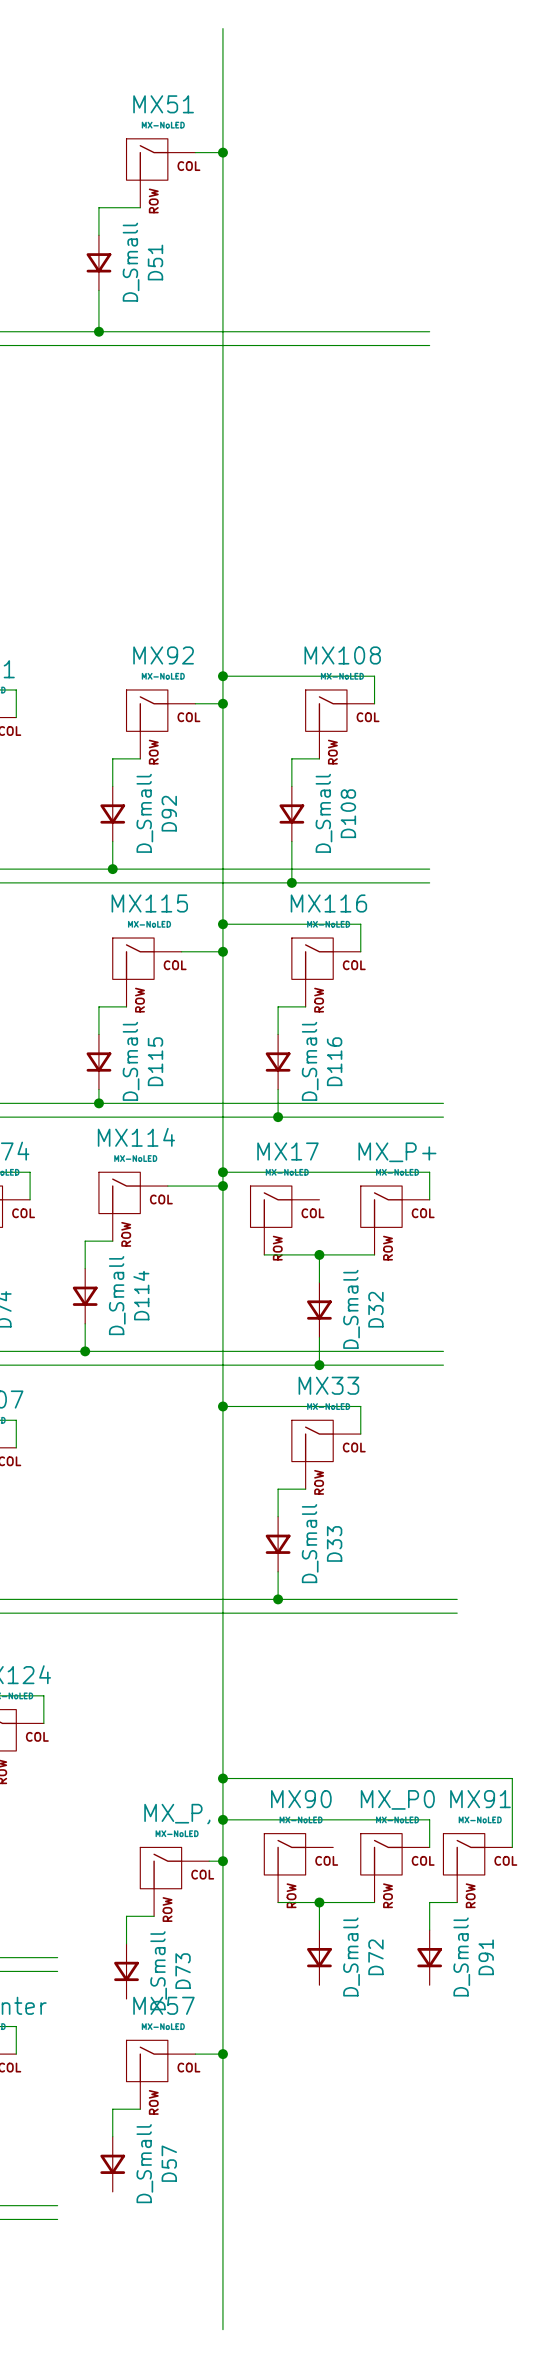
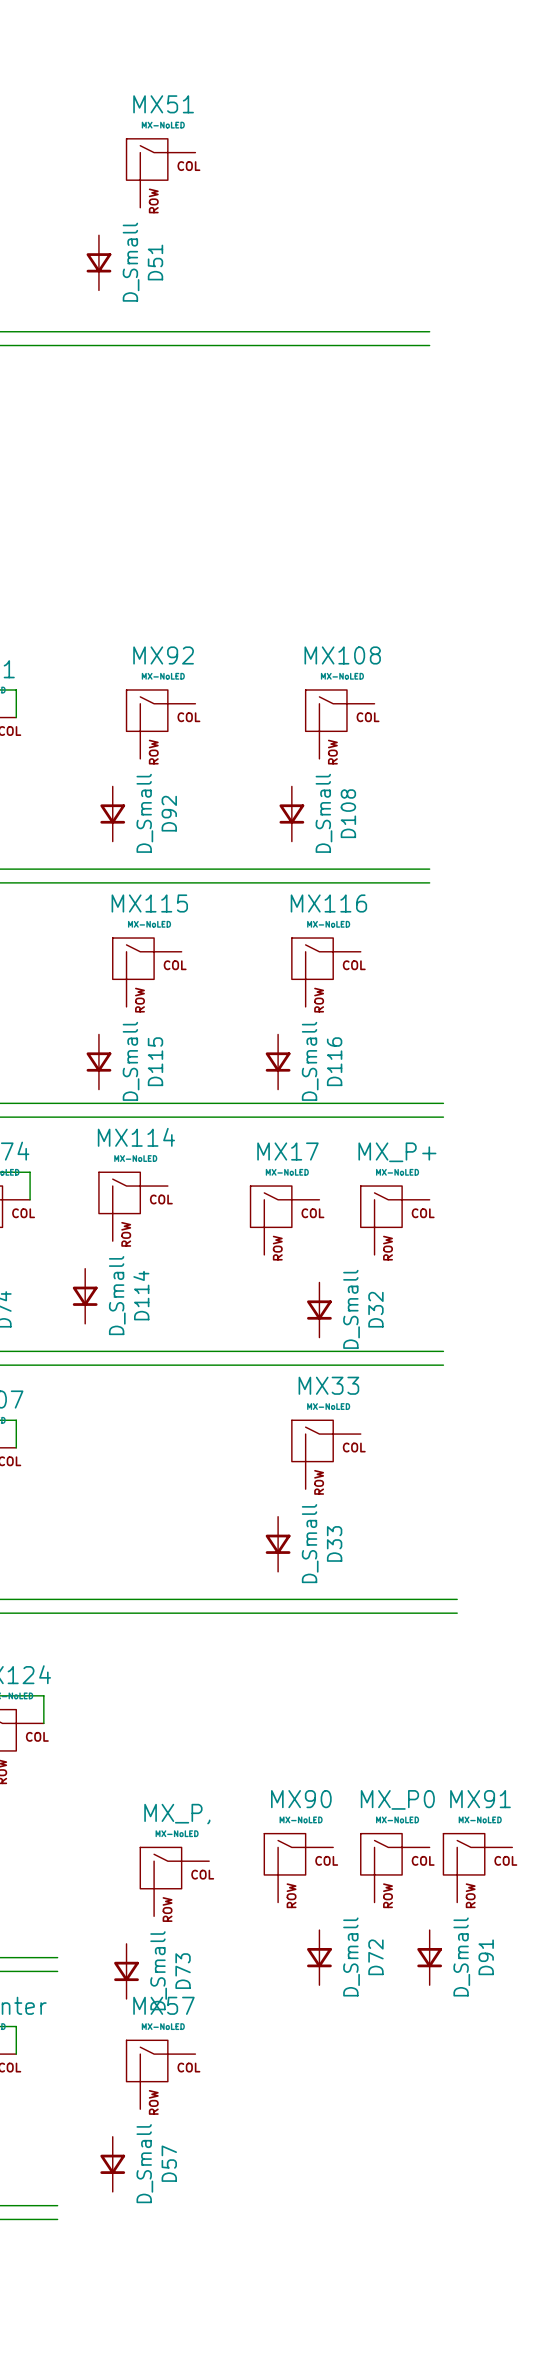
wire: (222, 28) (222, 2329) -> none
wire: (195, 152) (222, 152) -> none
junction: (222, 152) -> none
wire: (140, 207) (98, 207) (98, 235) -> none
wire: (98, 290) (98, 331) -> none
junction: (98, 331) -> none
wire: (222, 676) (374, 676) (374, 703) -> none
junction: (222, 676) -> none
wire: (195, 703) (222, 703) -> none
junction: (222, 703) -> none
wire: (140, 758) (112, 758) (112, 786) -> none
wire: (319, 758) (291, 758) (291, 786) -> none
wire: (112, 841) (112, 869) -> none
wire: (291, 841) (291, 882) -> none
junction: (112, 869) -> none
junction: (291, 882) -> none
wire: (222, 924) (360, 924) (360, 951) -> none
junction: (222, 924) -> none
wire: (181, 951) (222, 951) -> none
junction: (222, 951) -> none
wire: (126, 1006) (98, 1006) (98, 1034) -> none
wire: (305, 1006) (278, 1006) (278, 1034) -> none
wire: (98, 1089) (98, 1103) -> none
wire: (278, 1089) (278, 1117) -> none
junction: (98, 1103) -> none
junction: (278, 1117) -> none
wire: (222, 1172) (429, 1172) (429, 1199) -> none
junction: (222, 1172) -> none
wire: (167, 1186) (222, 1186) -> none
junction: (222, 1186) -> none
wire: (112, 1241) (85, 1241) (85, 1268) -> none
wire: (264, 1254) (374, 1254) -> none
wire: (319, 1254) (319, 1282) -> none
junction: (319, 1254) -> none
wire: (85, 1323) (85, 1351) -> none
wire: (319, 1337) (319, 1365) -> none
junction: (85, 1351) -> none
junction: (319, 1365) -> none
wire: (222, 1406) (360, 1406) (360, 1434) -> none
junction: (222, 1406) -> none
wire: (305, 1489) (278, 1489) (278, 1516) -> none
wire: (278, 1571) (278, 1599) -> none
junction: (278, 1599) -> none
wire: (222, 1778) (512, 1778) (512, 1847) -> none
junction: (222, 1778) -> none
wire: (222, 1819) (429, 1819) (429, 1847) -> none
junction: (222, 1819) -> none
wire: (209, 1861) (222, 1861) -> none
junction: (222, 1861) -> none
wire: (278, 1902) (374, 1902) -> none
wire: (319, 1902) (319, 1930) -> none
junction: (319, 1902) -> none
wire: (457, 1902) (429, 1902) (429, 1930) -> none
wire: (154, 1916) (126, 1916) (126, 1943) -> none
wire: (195, 2054) (222, 2054) -> none
junction: (222, 2054) -> none
wire: (140, 2109) (112, 2109) (112, 2136) -> none

